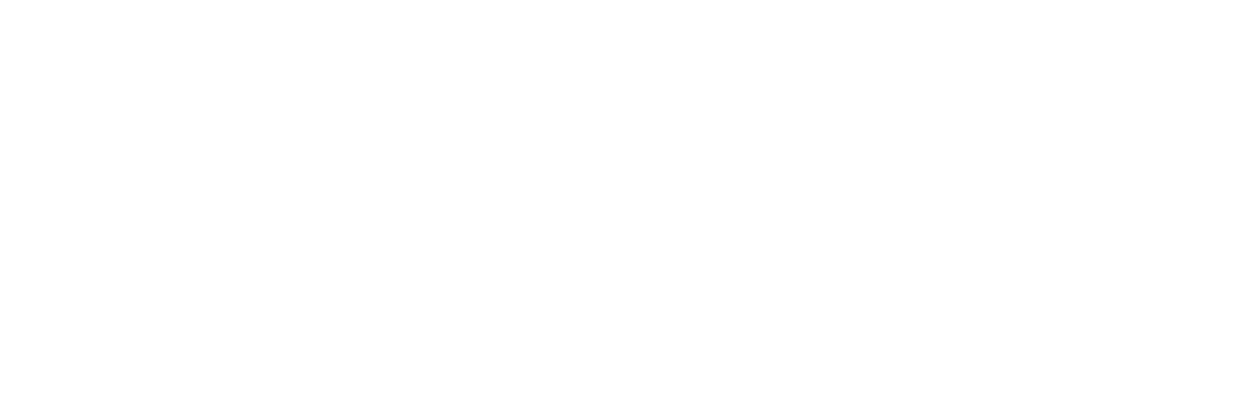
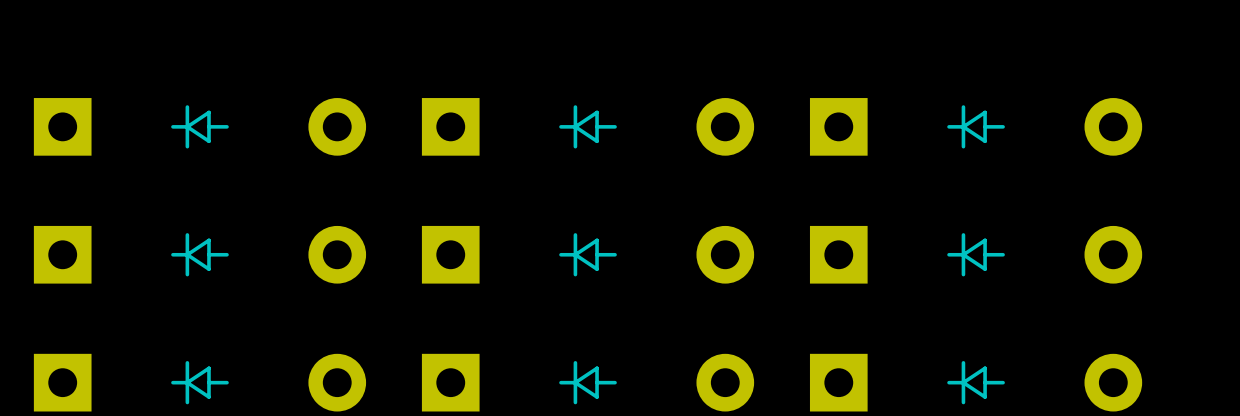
part: none -> (199, 126)
part: none -> (588, 126)
part: none -> (976, 126)
part: none -> (199, 254)
part: none -> (588, 254)
part: none -> (976, 254)
part: none -> (199, 382)
part: none -> (588, 382)
part: none -> (976, 382)

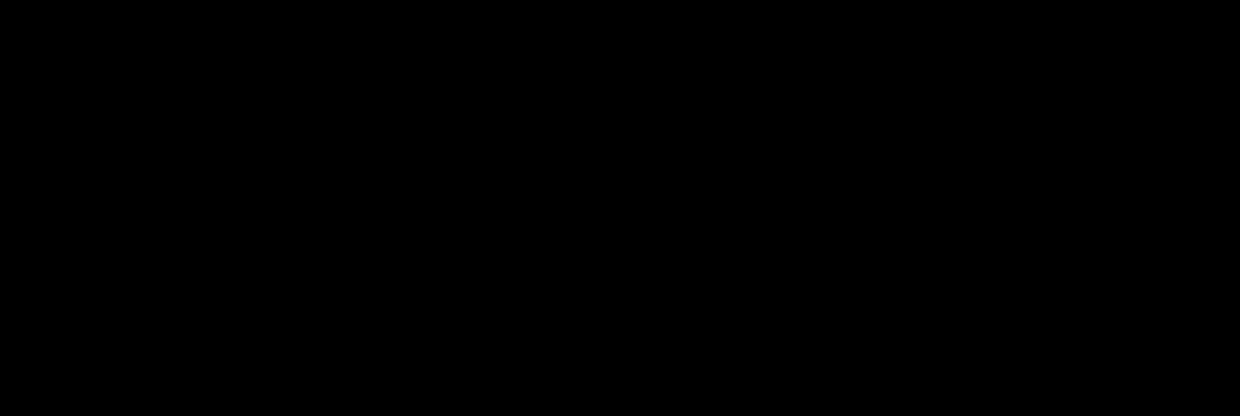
part: (199, 126) -> none
part: (588, 126) -> none
part: (976, 126) -> none
part: (199, 254) -> none
part: (588, 254) -> none
part: (976, 254) -> none
part: (199, 382) -> none
part: (588, 382) -> none
part: (976, 382) -> none

